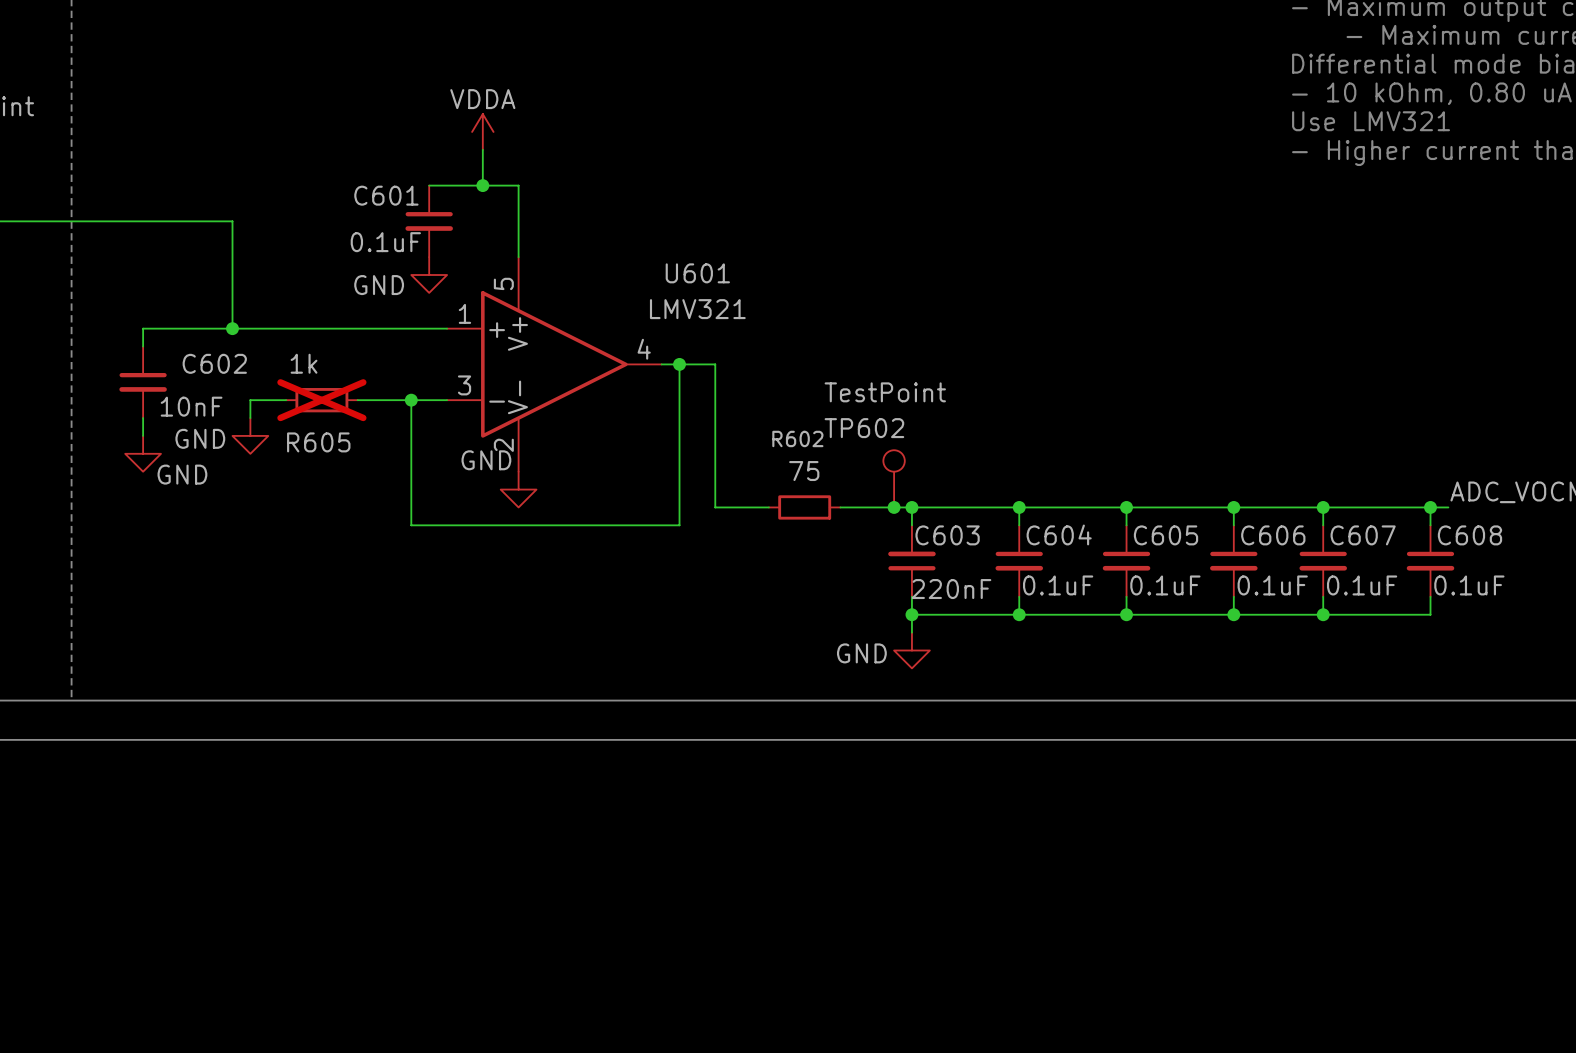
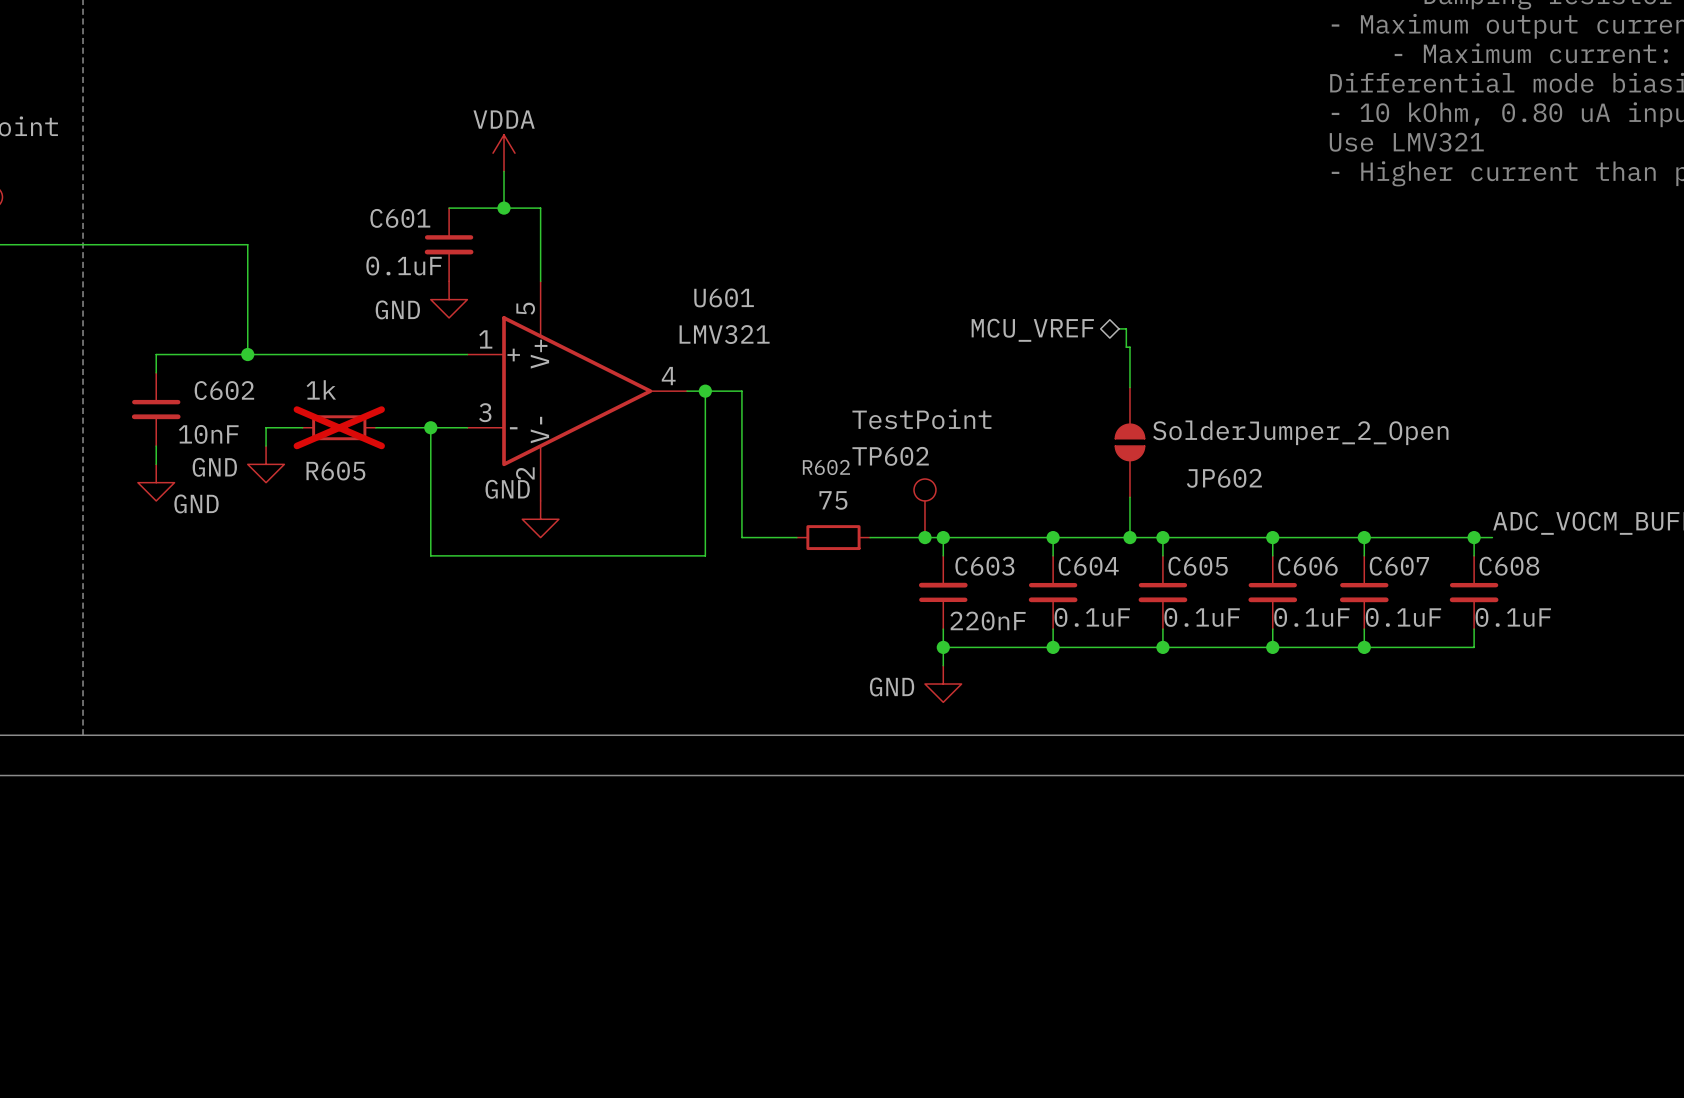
hierarchical label: none -> MCU_VREF (1032, 330)
wire: none -> (1119, 328) (1126, 328) (1126, 347) (1129, 347) (1129, 387)
JP602: none -> SolderJumper_2_Open (1129, 442)
wire: none -> (1129, 497) (1129, 537)
junction: none -> (1129, 537)

